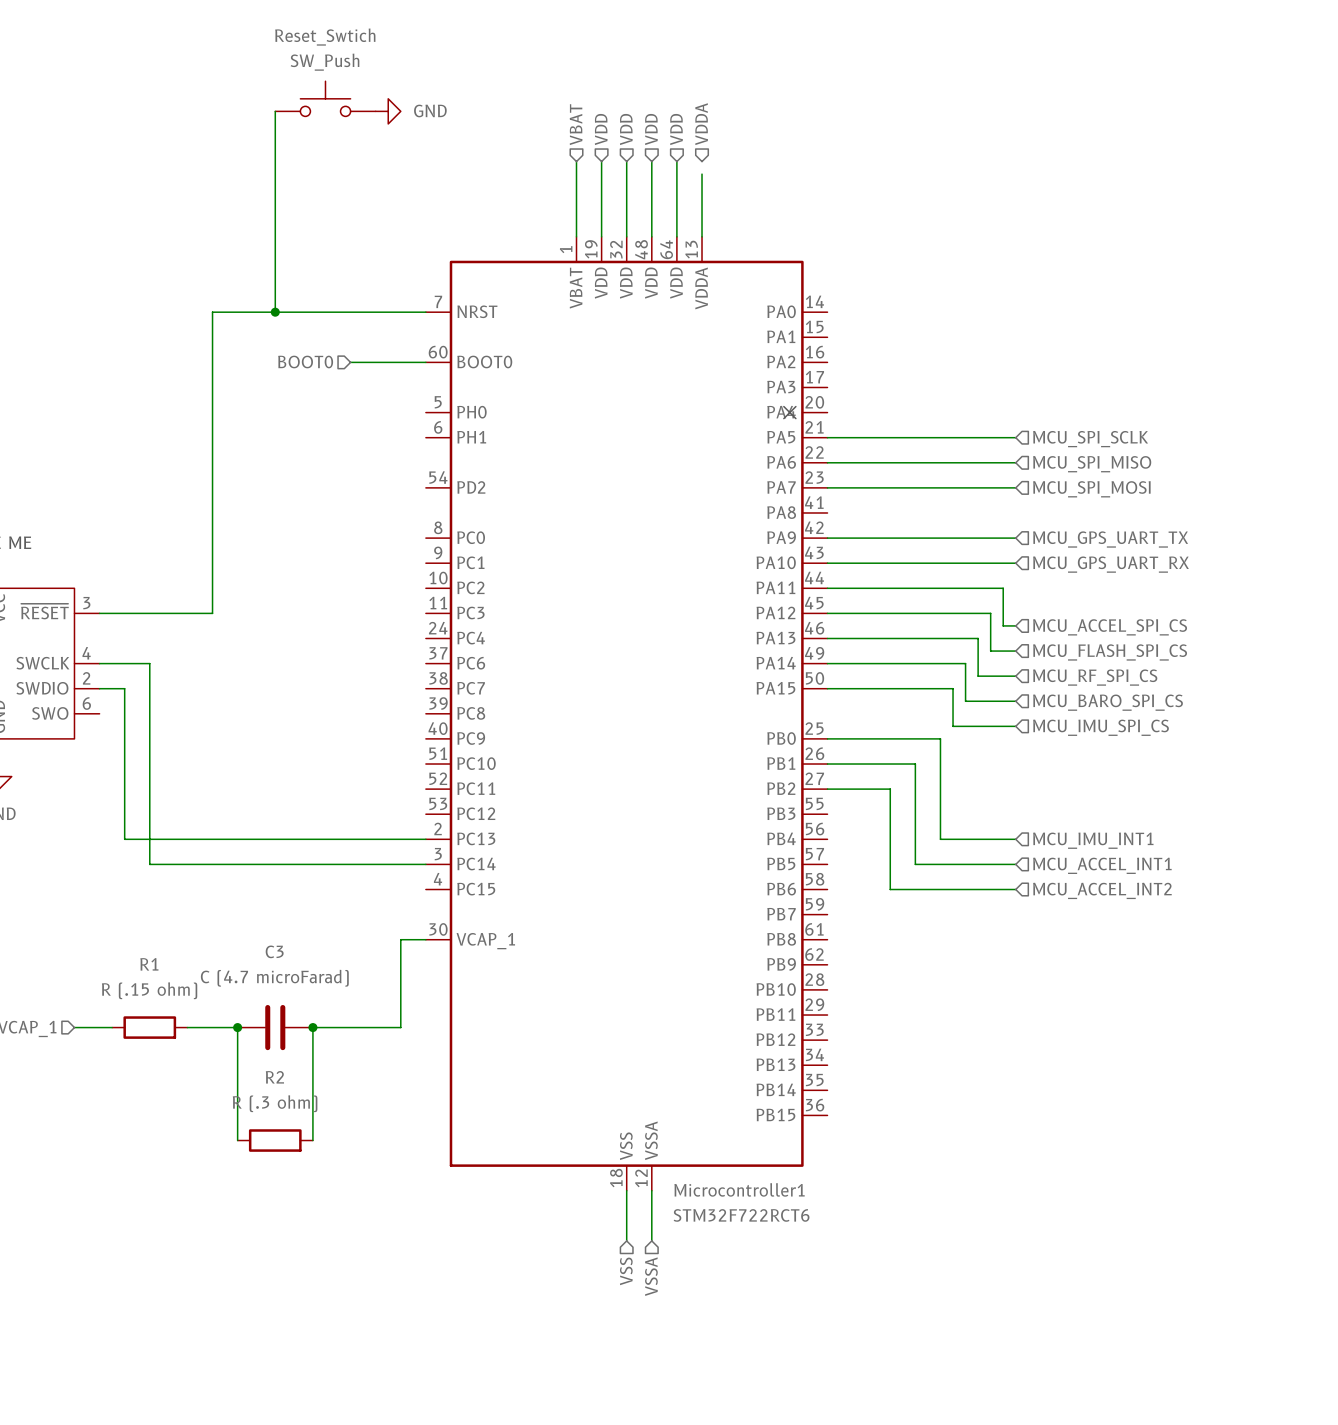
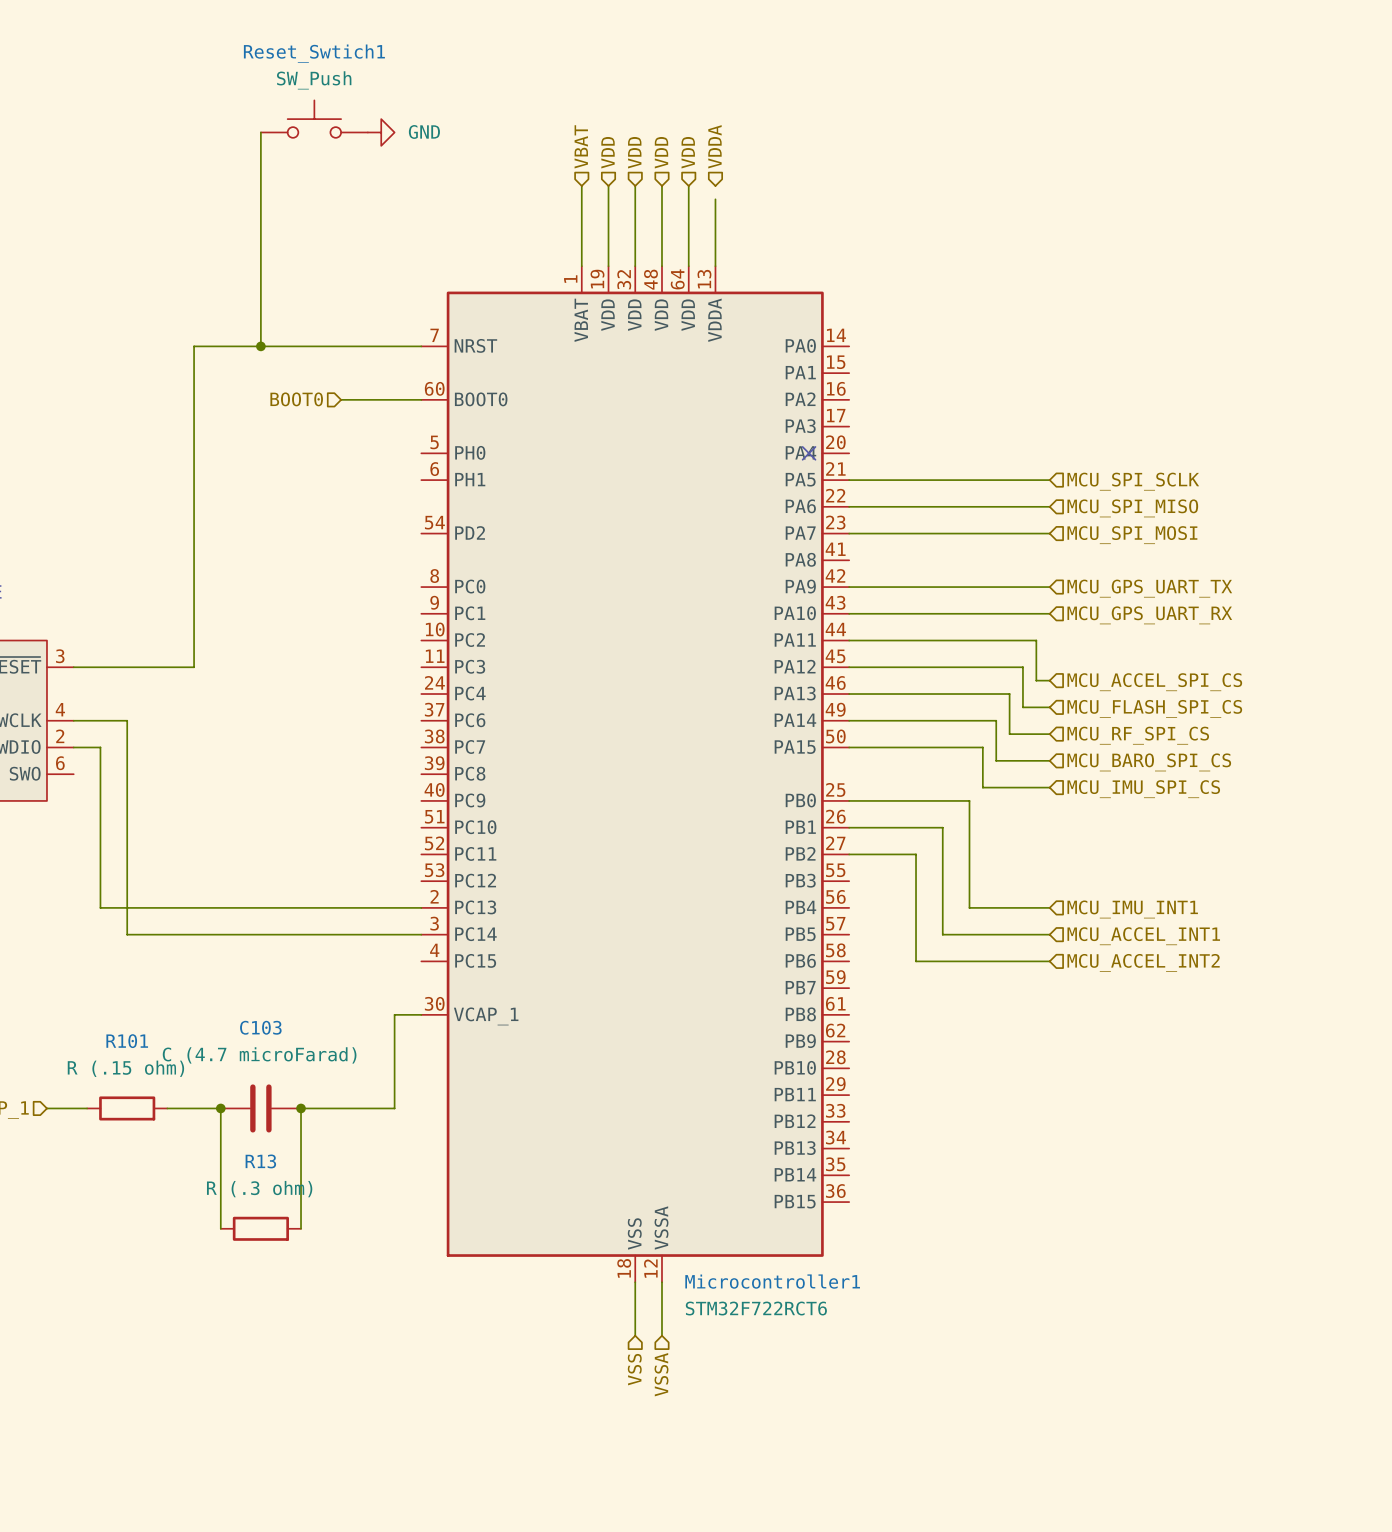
Reset_Swtich name: Reset_Swtich (325, 37) -> Reset_Swtich1 (314, 53)
C3 name: C3 (274, 951) -> C103 (260, 1027)
R1 name: R1 (149, 964) -> R101 (127, 1041)
R2 name: R2 (274, 1077) -> R13 (260, 1161)

